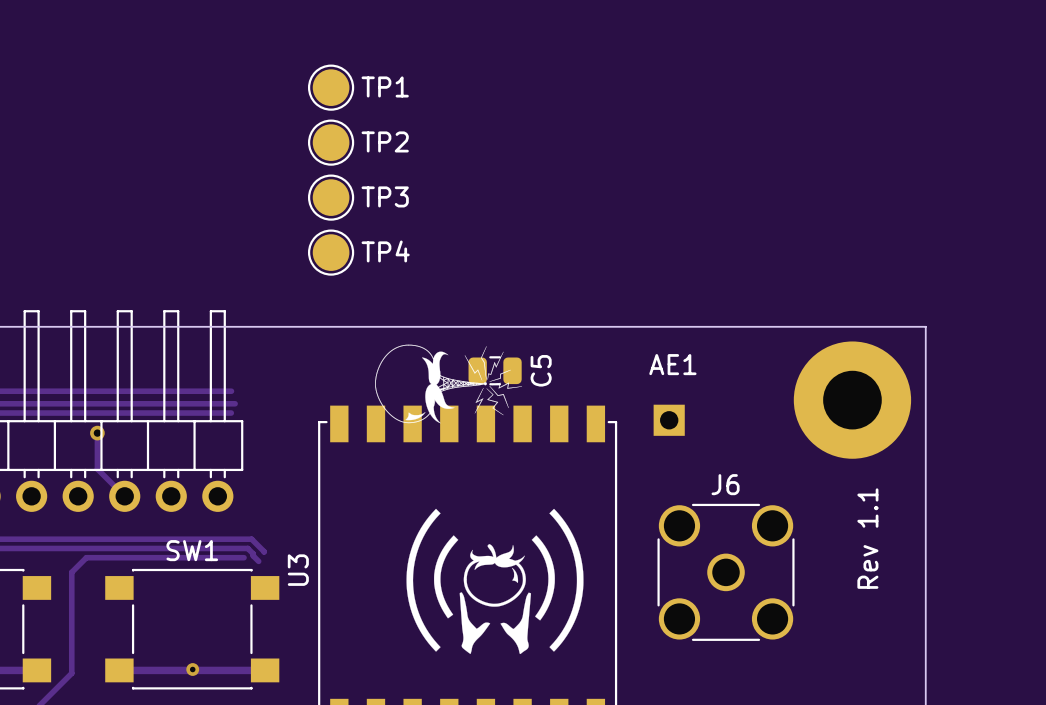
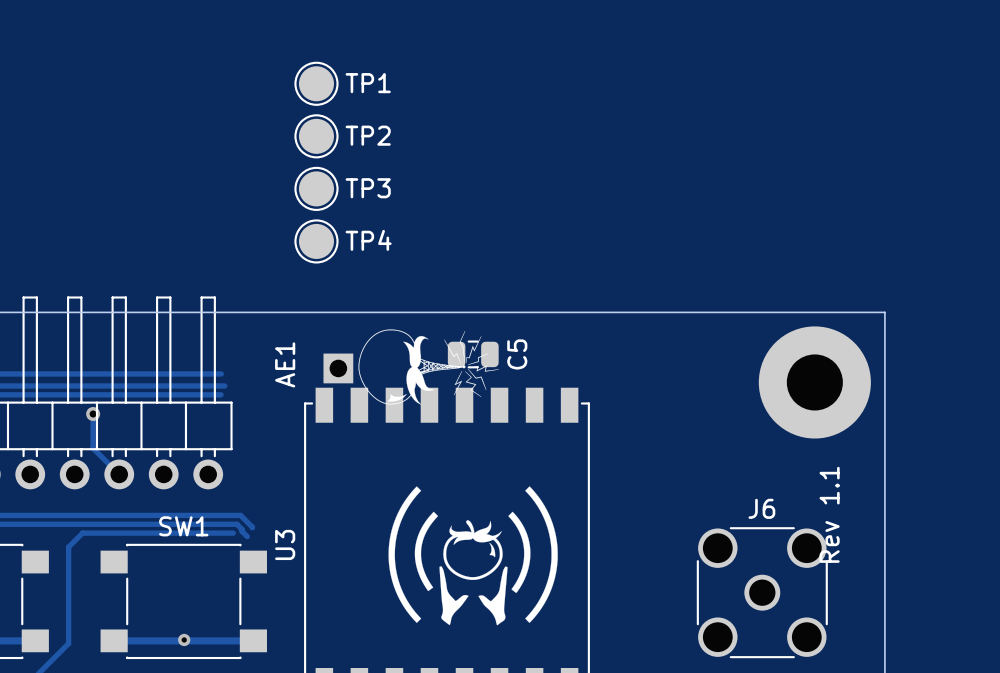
AE1 name rotation: 0° (672, 364) -> 90° counterclockwise (285, 364)
AE1 name position: AE1 (672, 364) -> AE1 (285, 364)
AE1 position: (669, 420) -> (338, 368)
J6 position: (726, 572) -> (762, 592)

